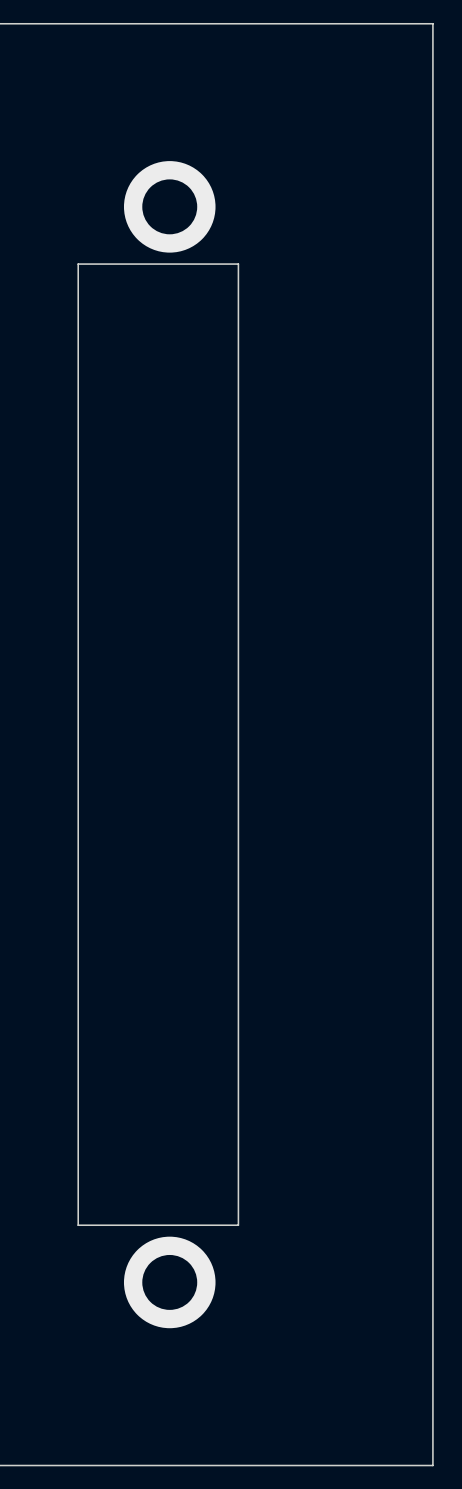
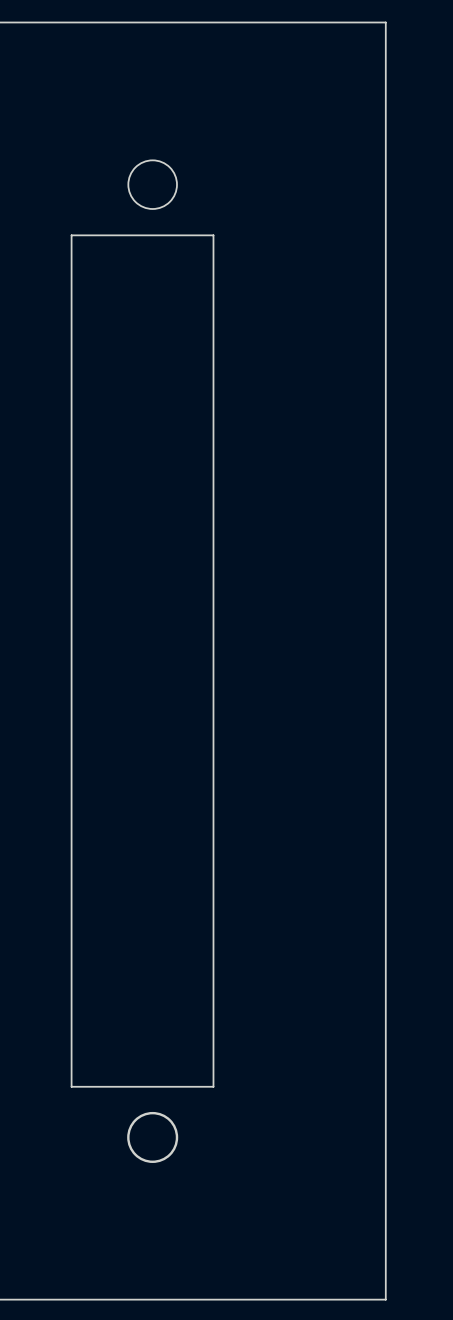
round board edge: none -> [127, 159, 178, 210]
via: (169, 206) -> none
round board edge: none -> [127, 1111, 179, 1163]
via: (169, 1282) -> none

